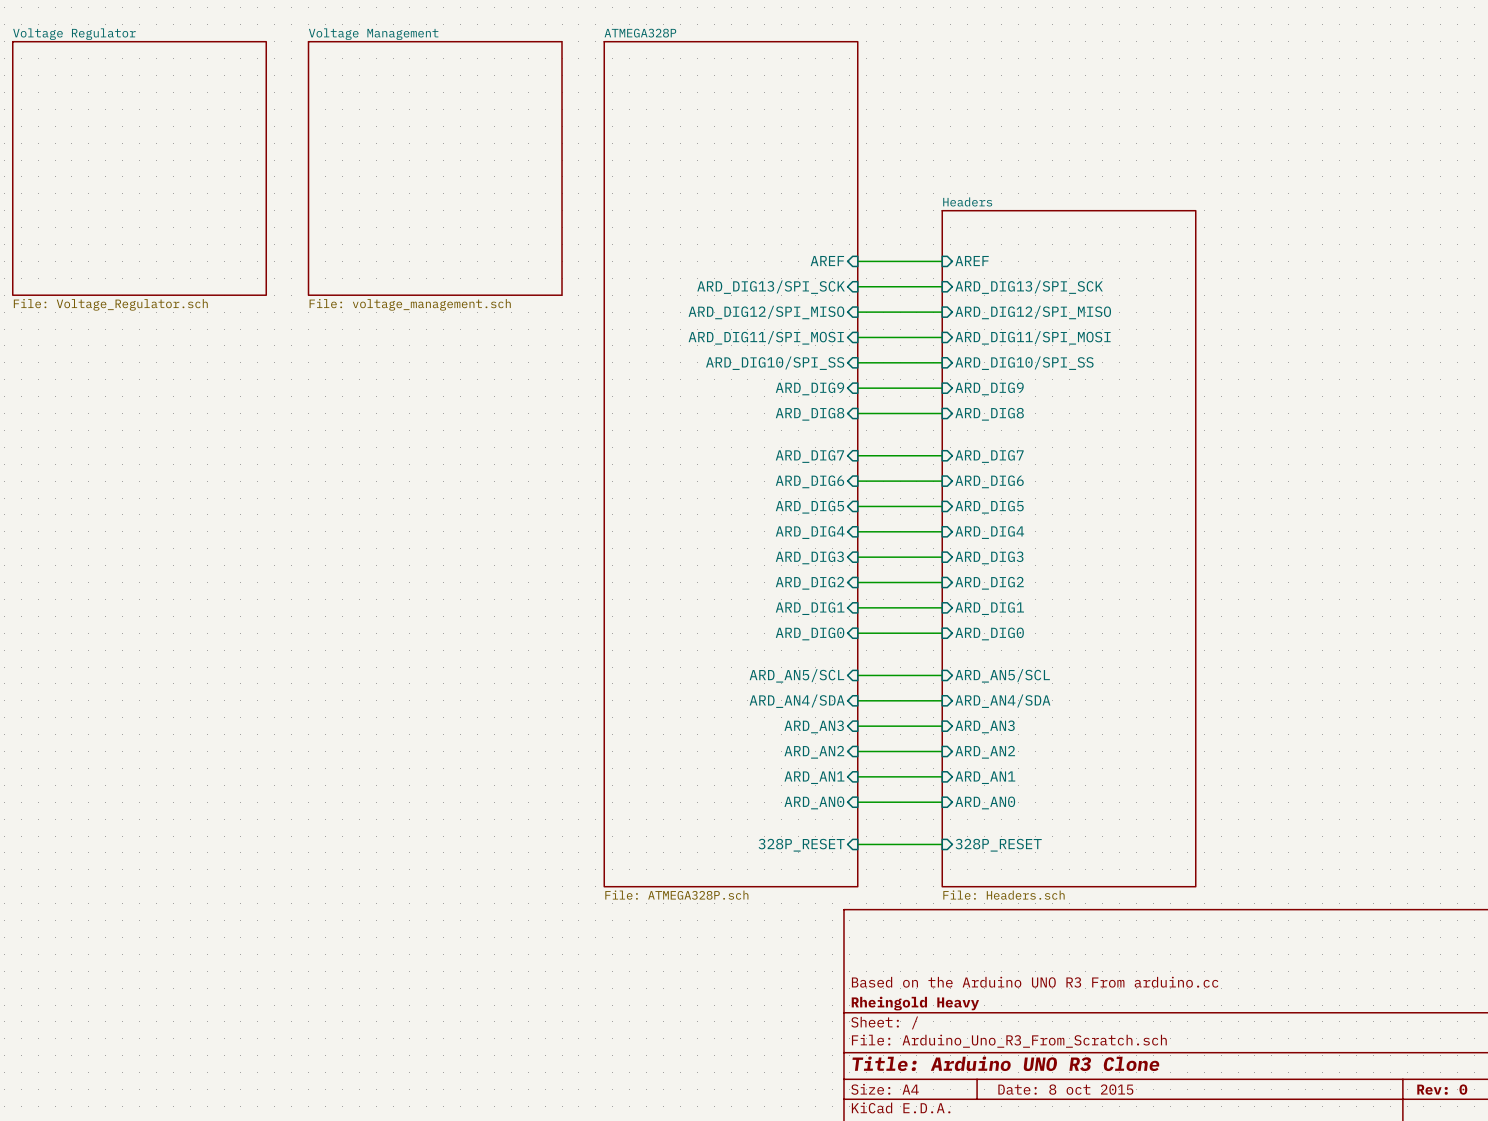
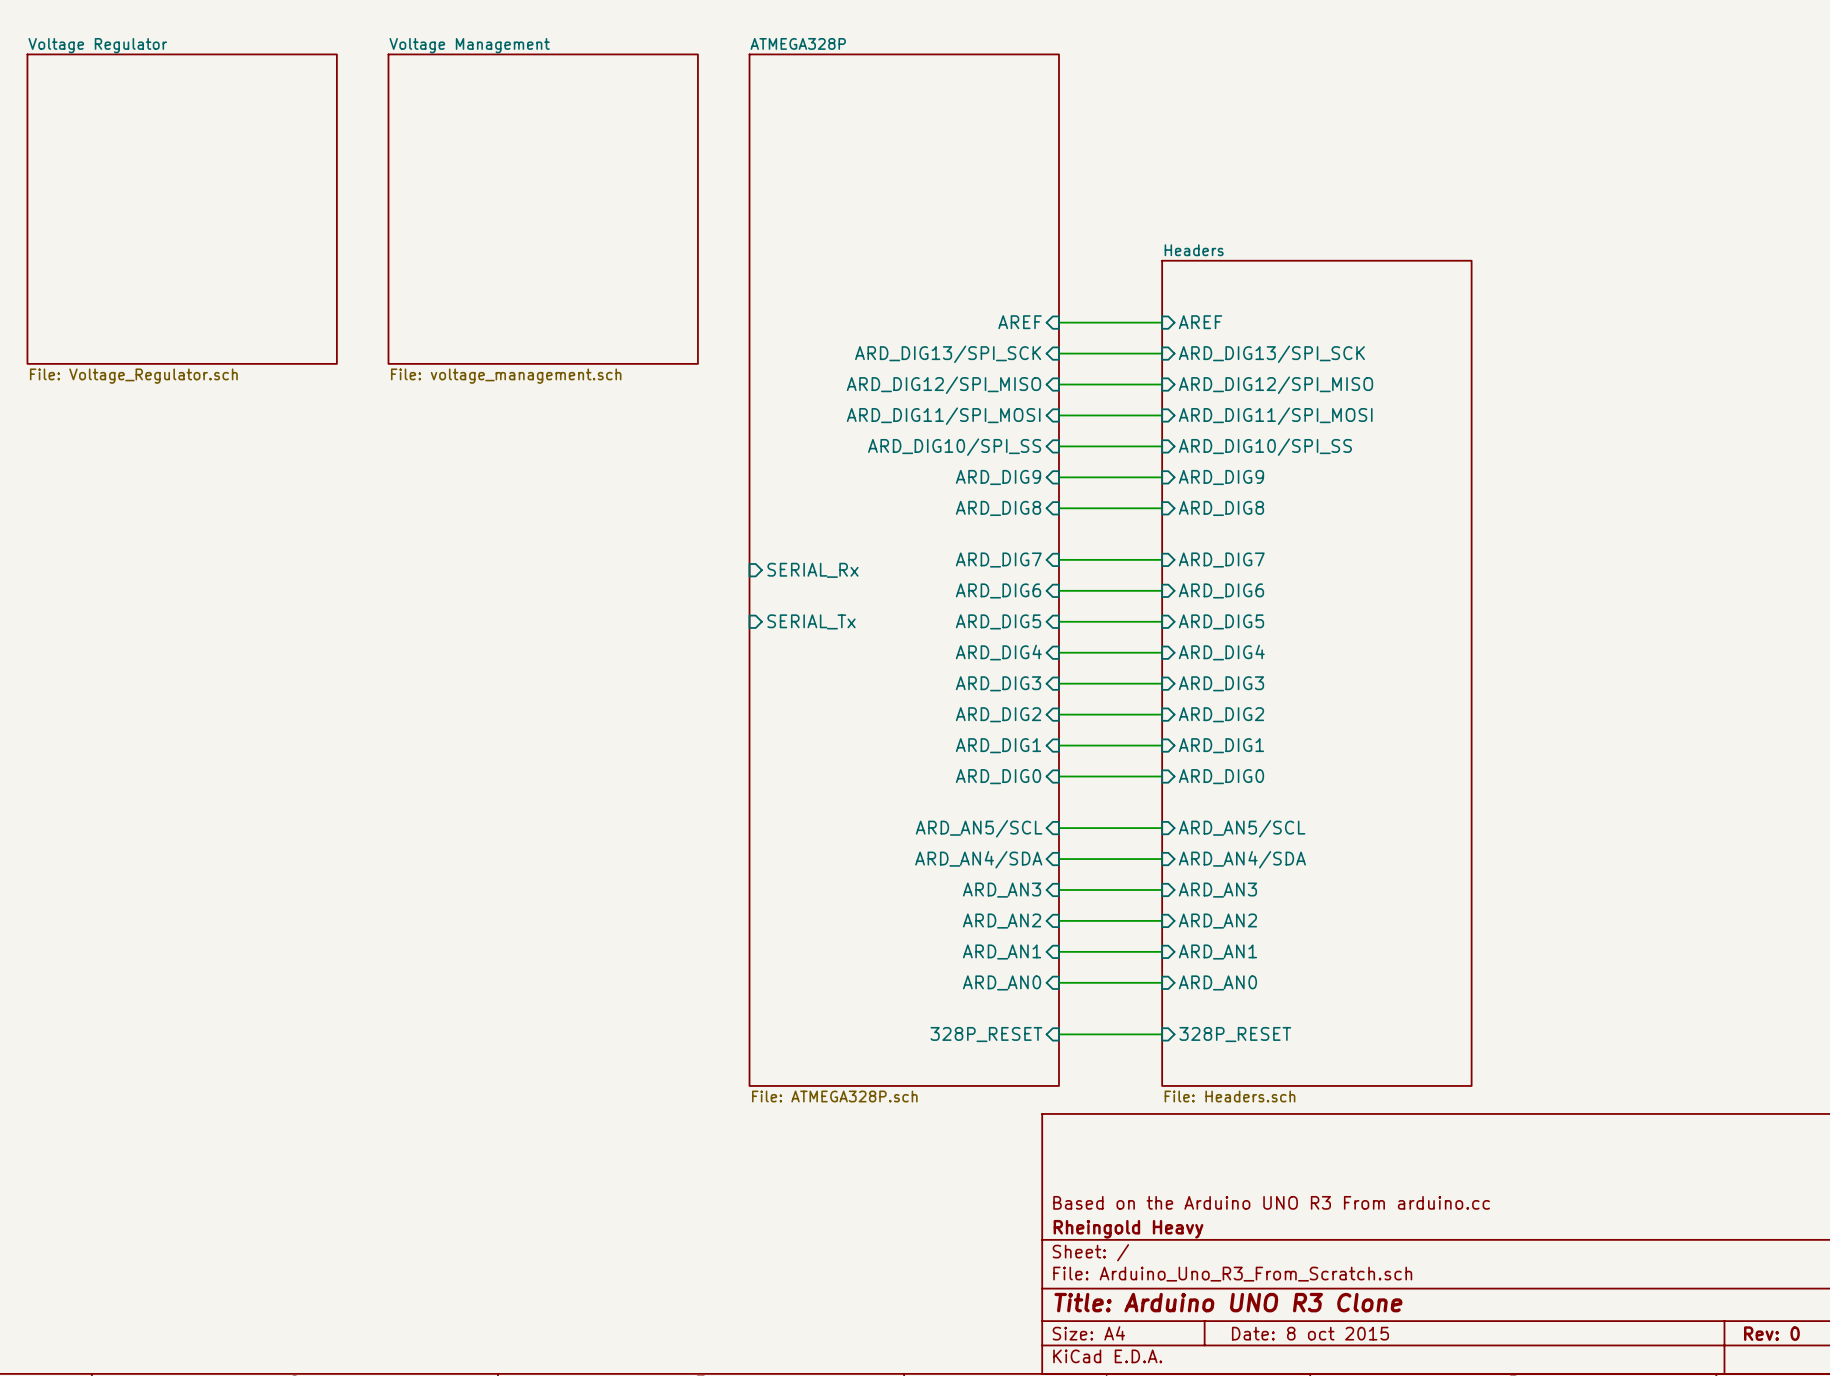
sheet pin: none -> SERIAL_Rx (812, 570)
sheet pin: none -> SERIAL_Tx (811, 621)

